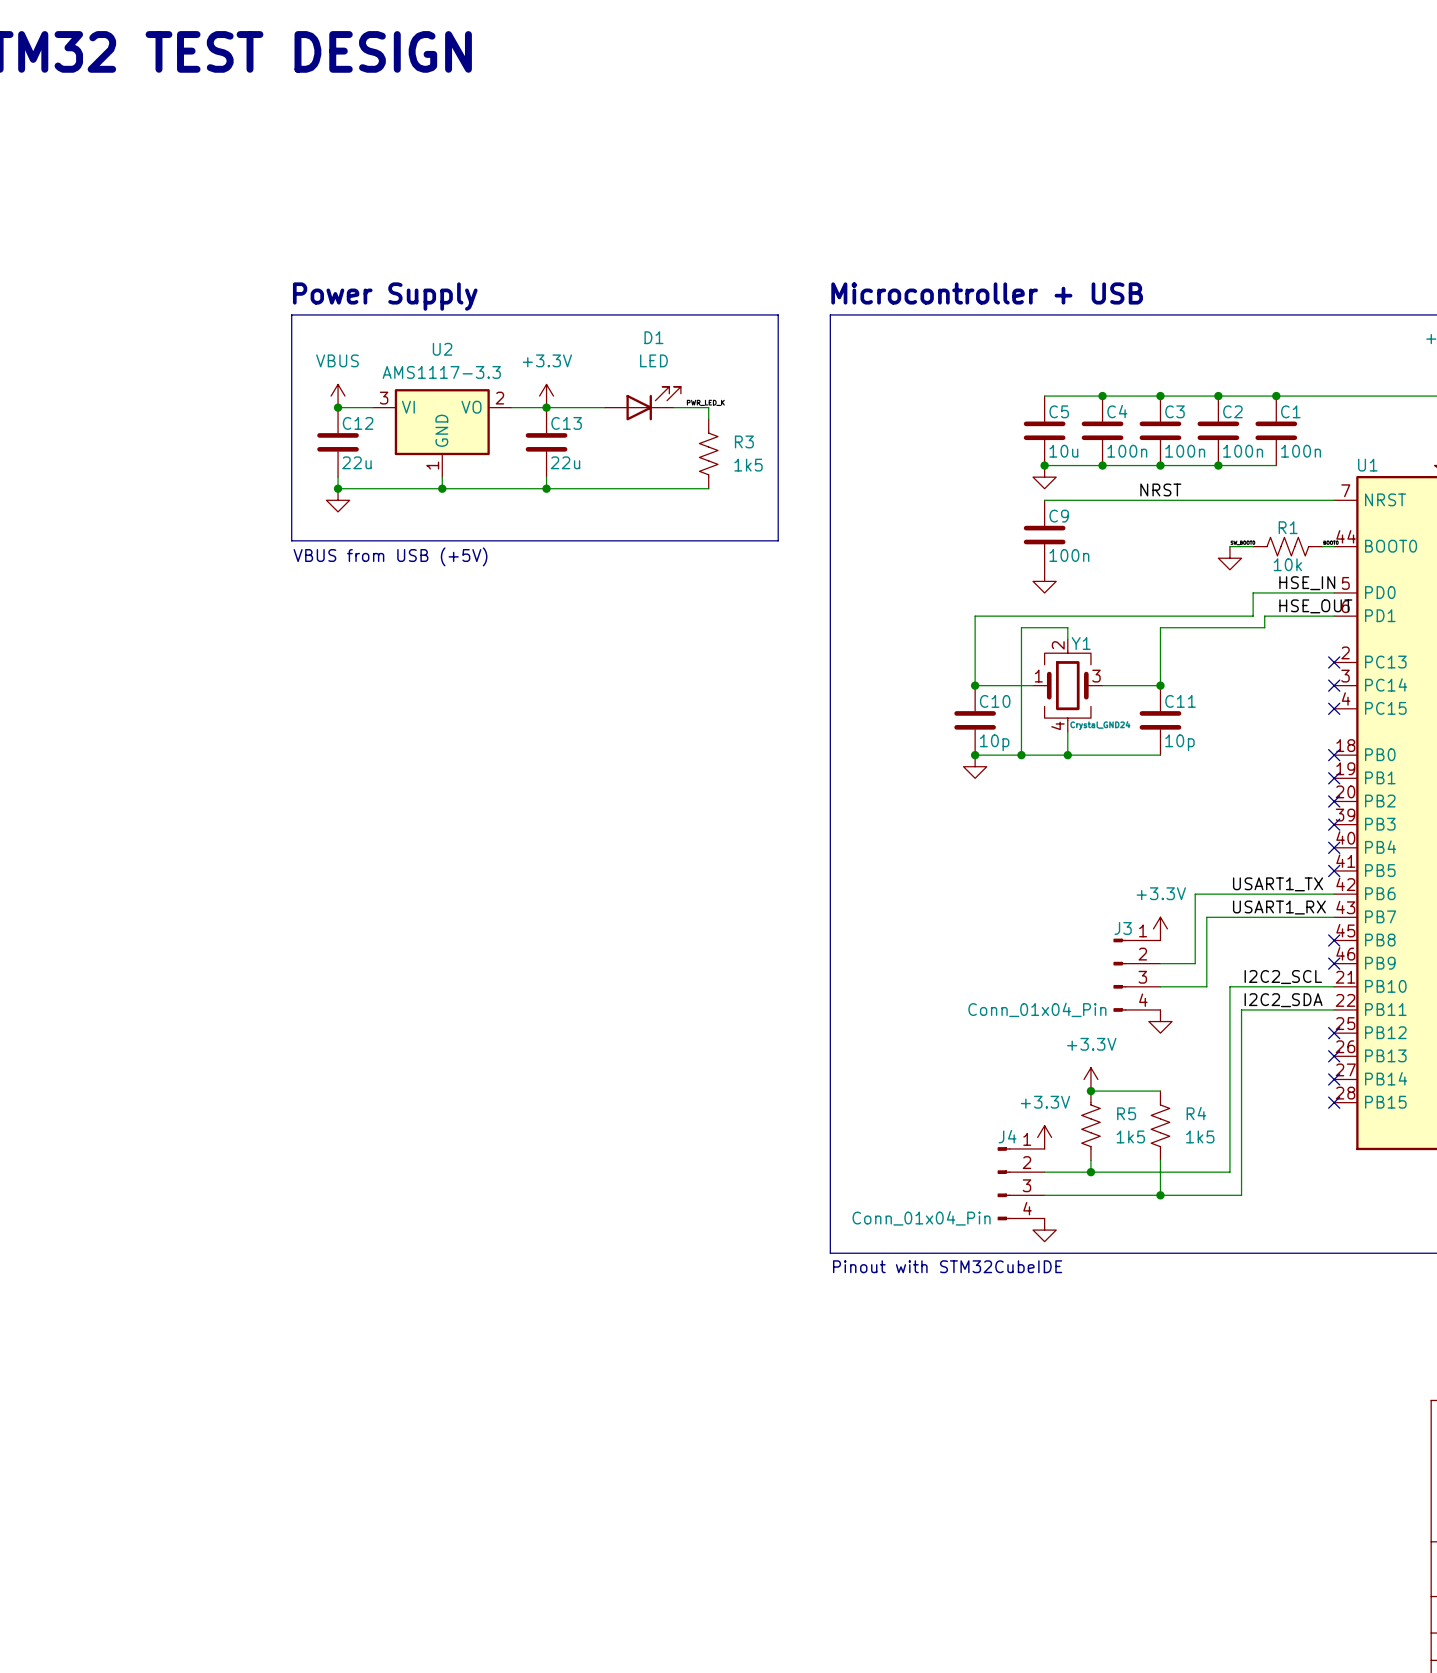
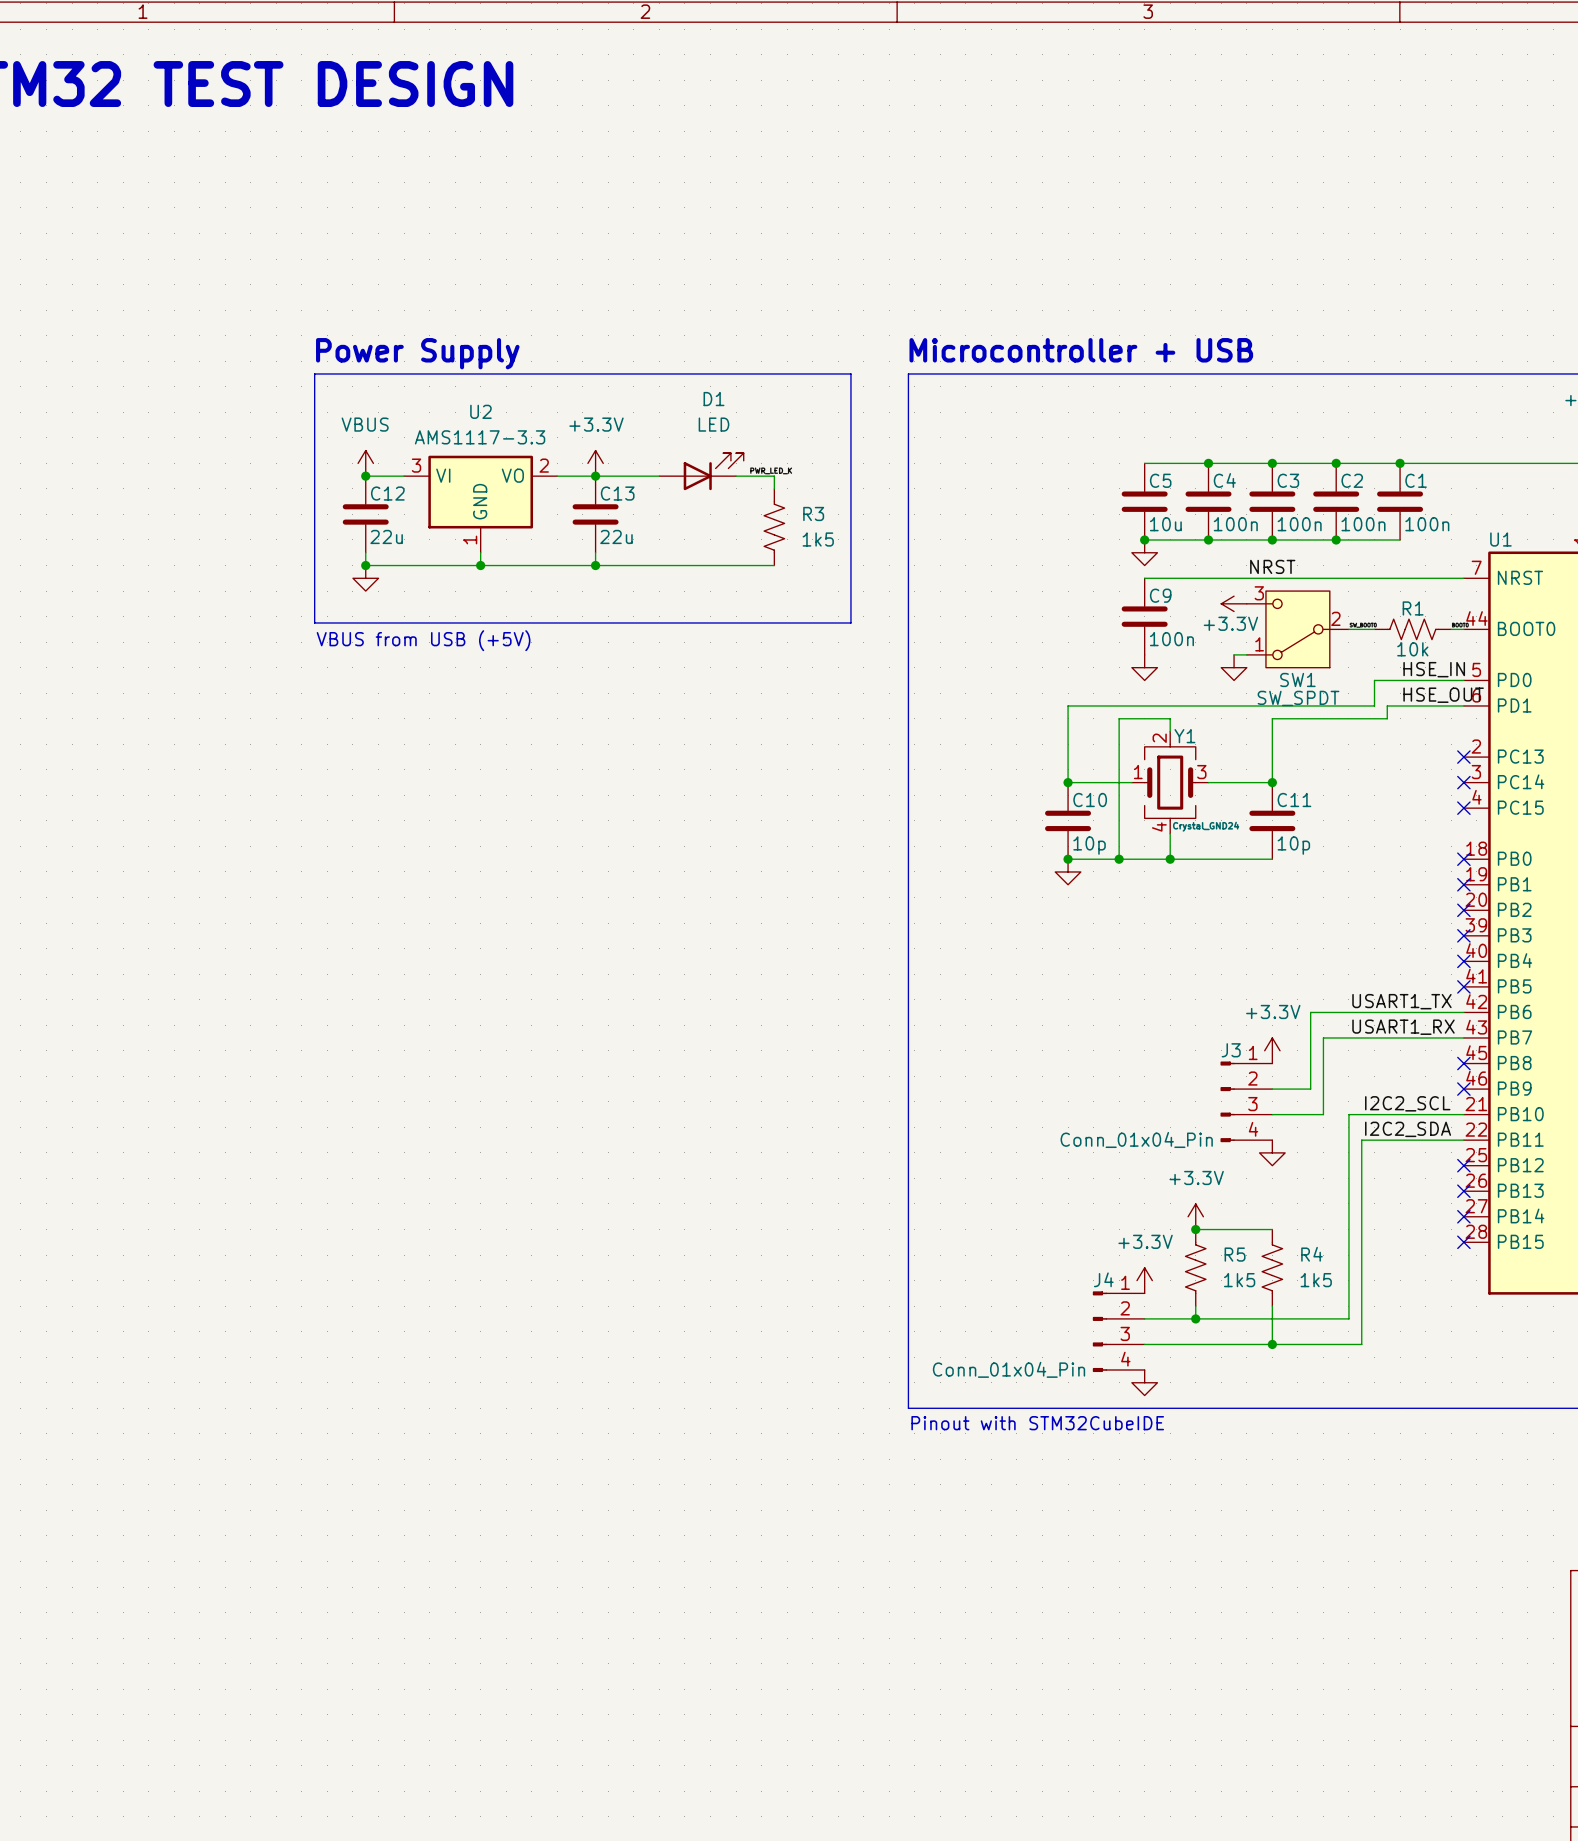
power symbol: none -> +3.3V (1234, 603)
SW1: none -> SW_SPDT (1297, 629)
power symbol position: (1229, 558) -> (1234, 667)
wire: none -> (1234, 654) (1246, 654)

